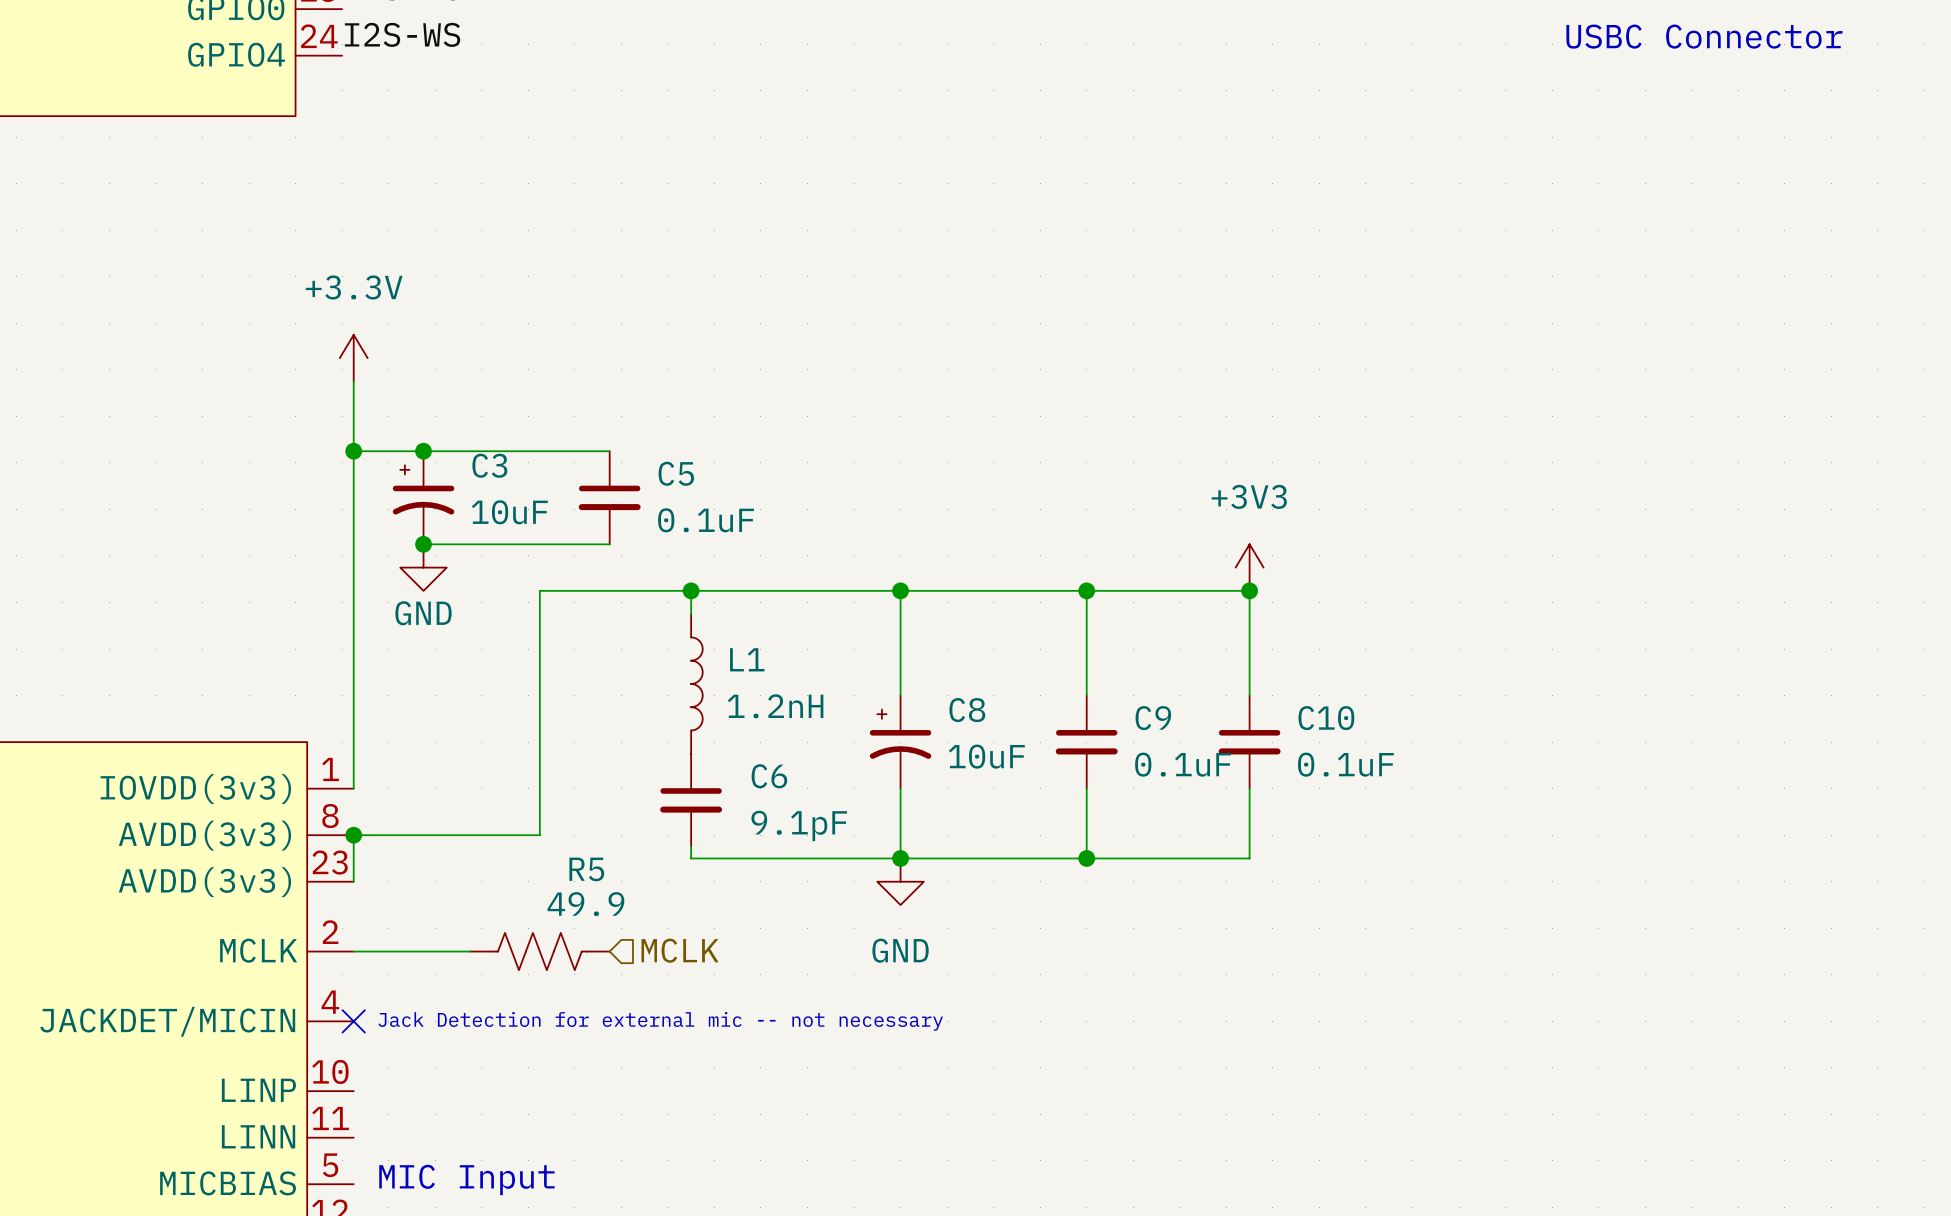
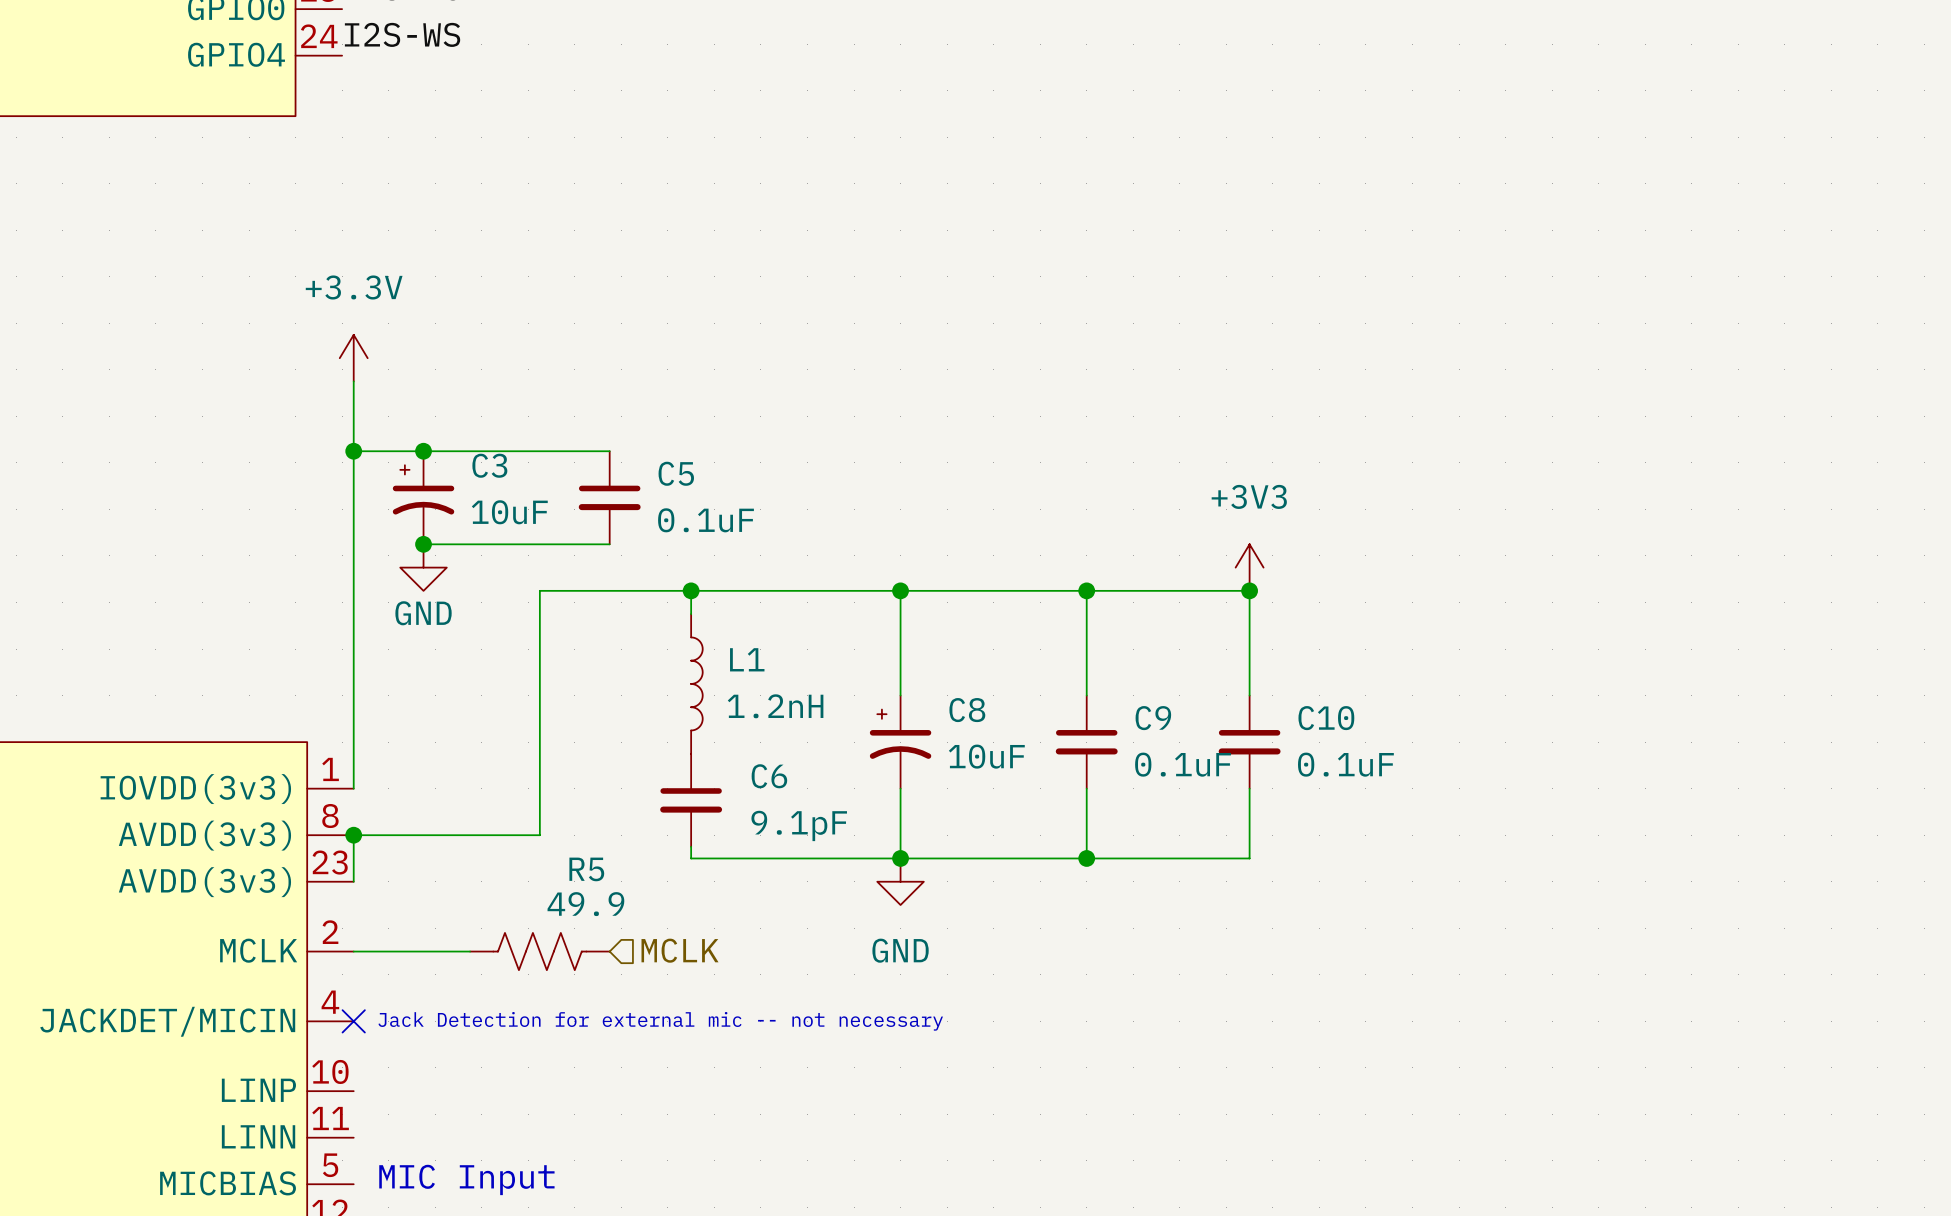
text: USBC Connector (1704, 36) -> none

